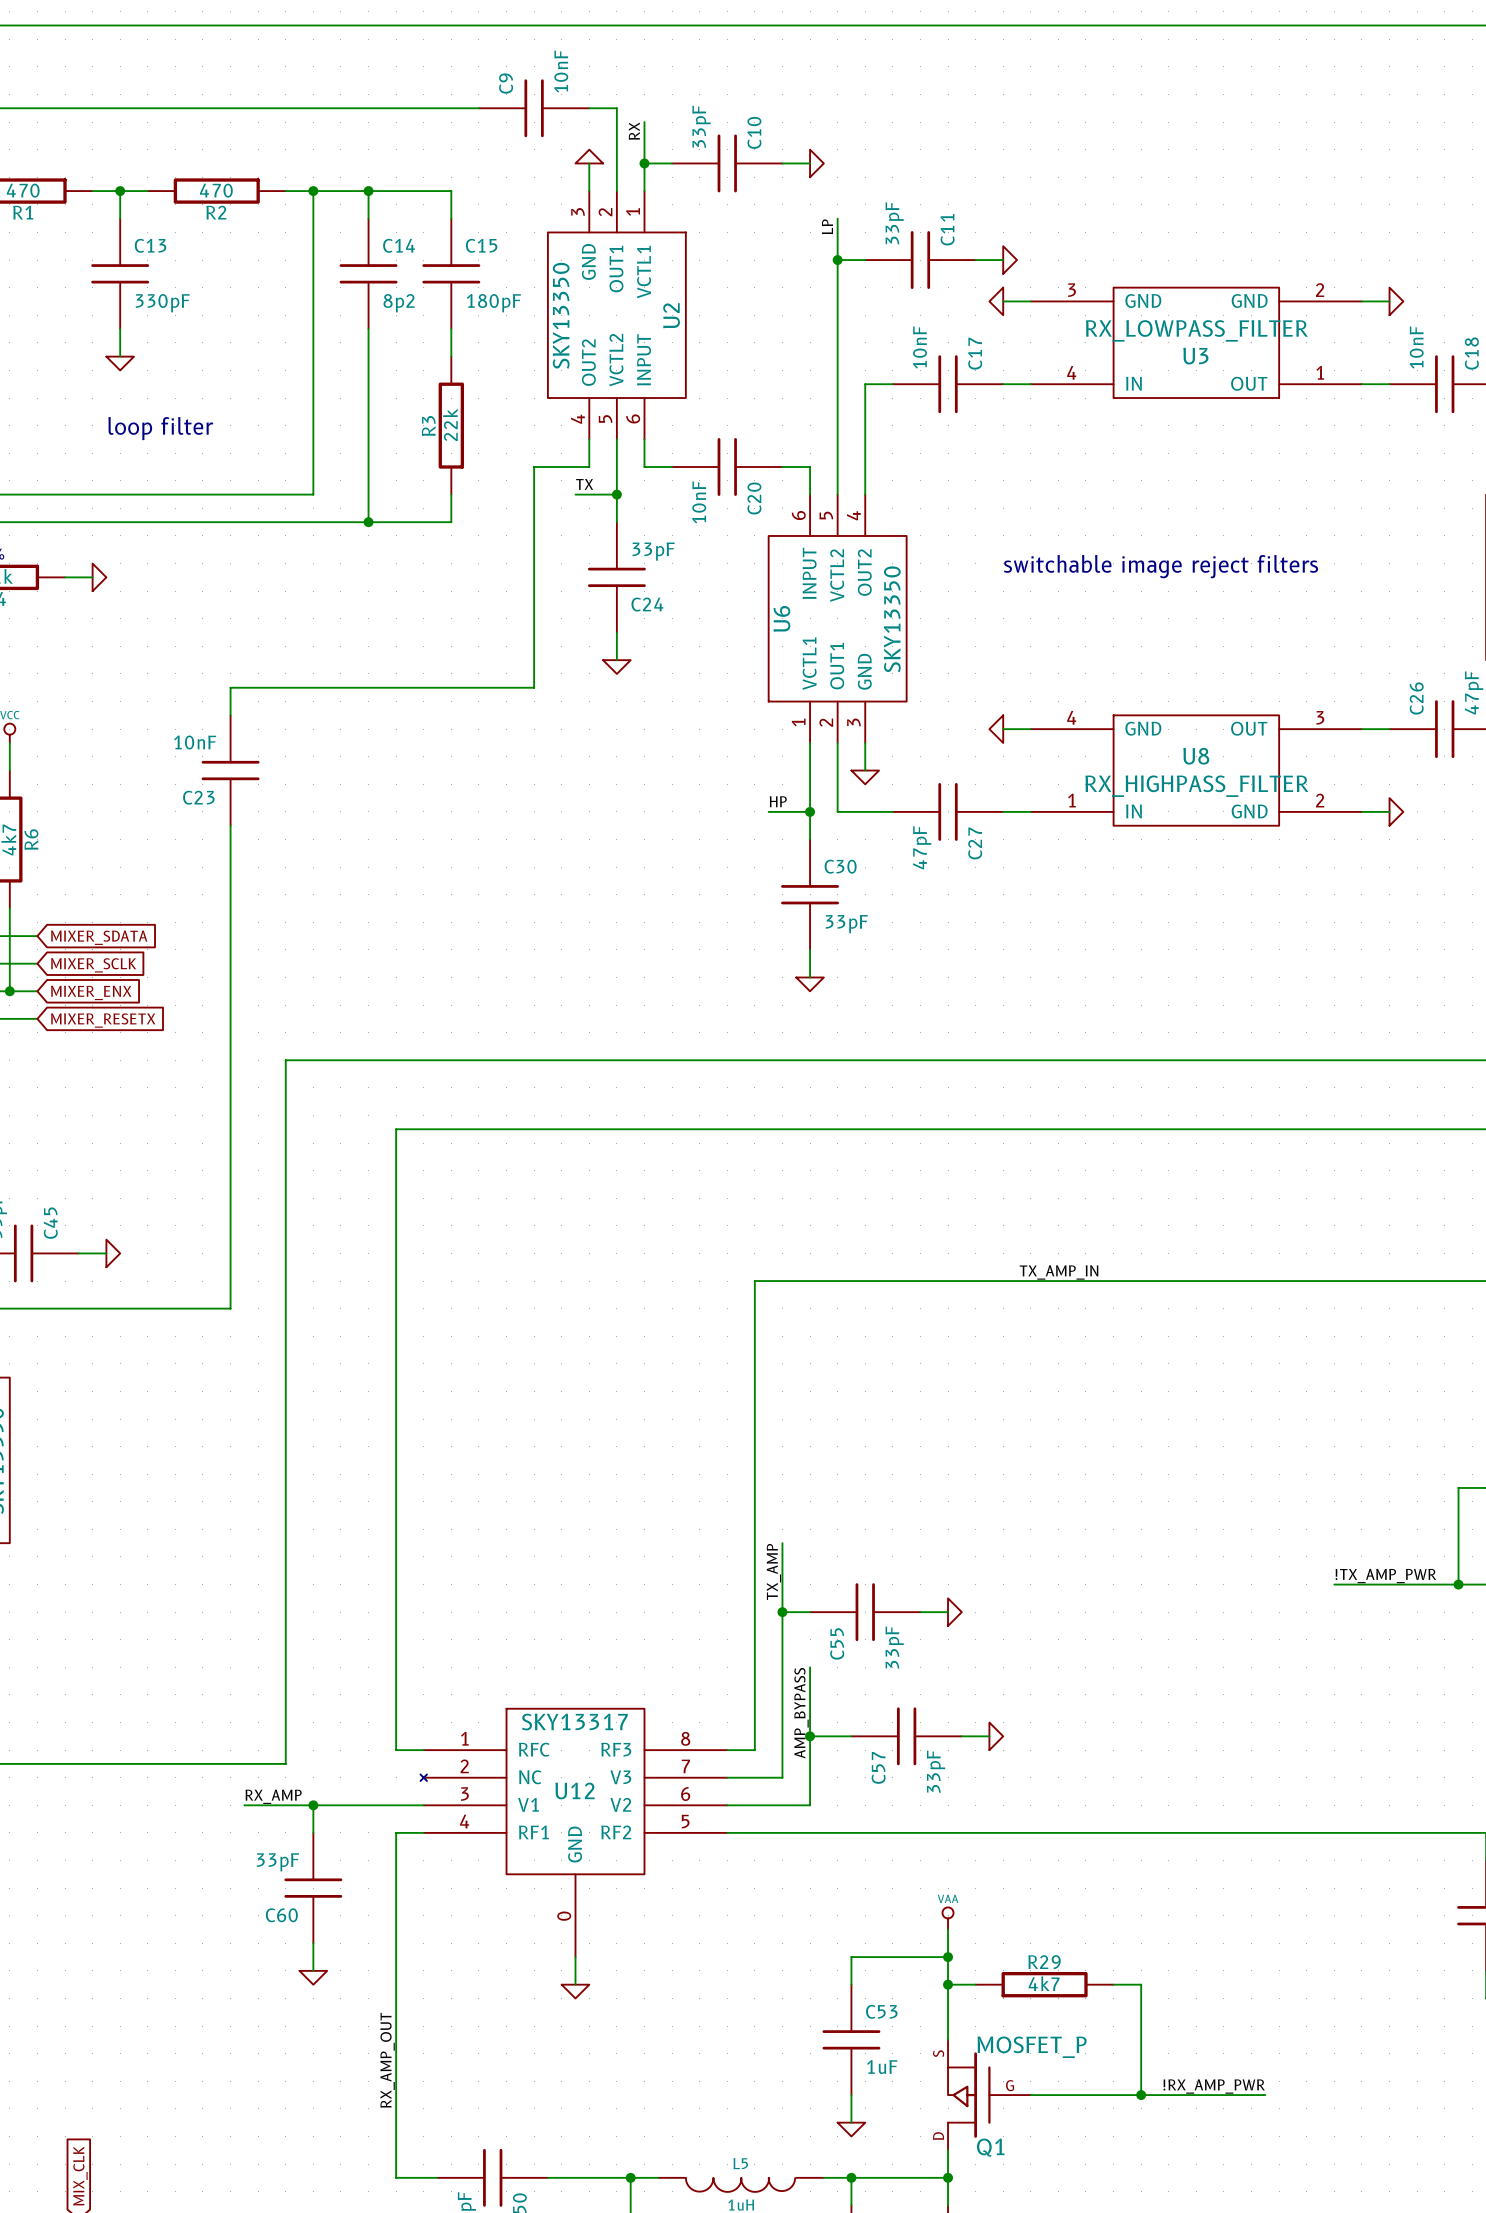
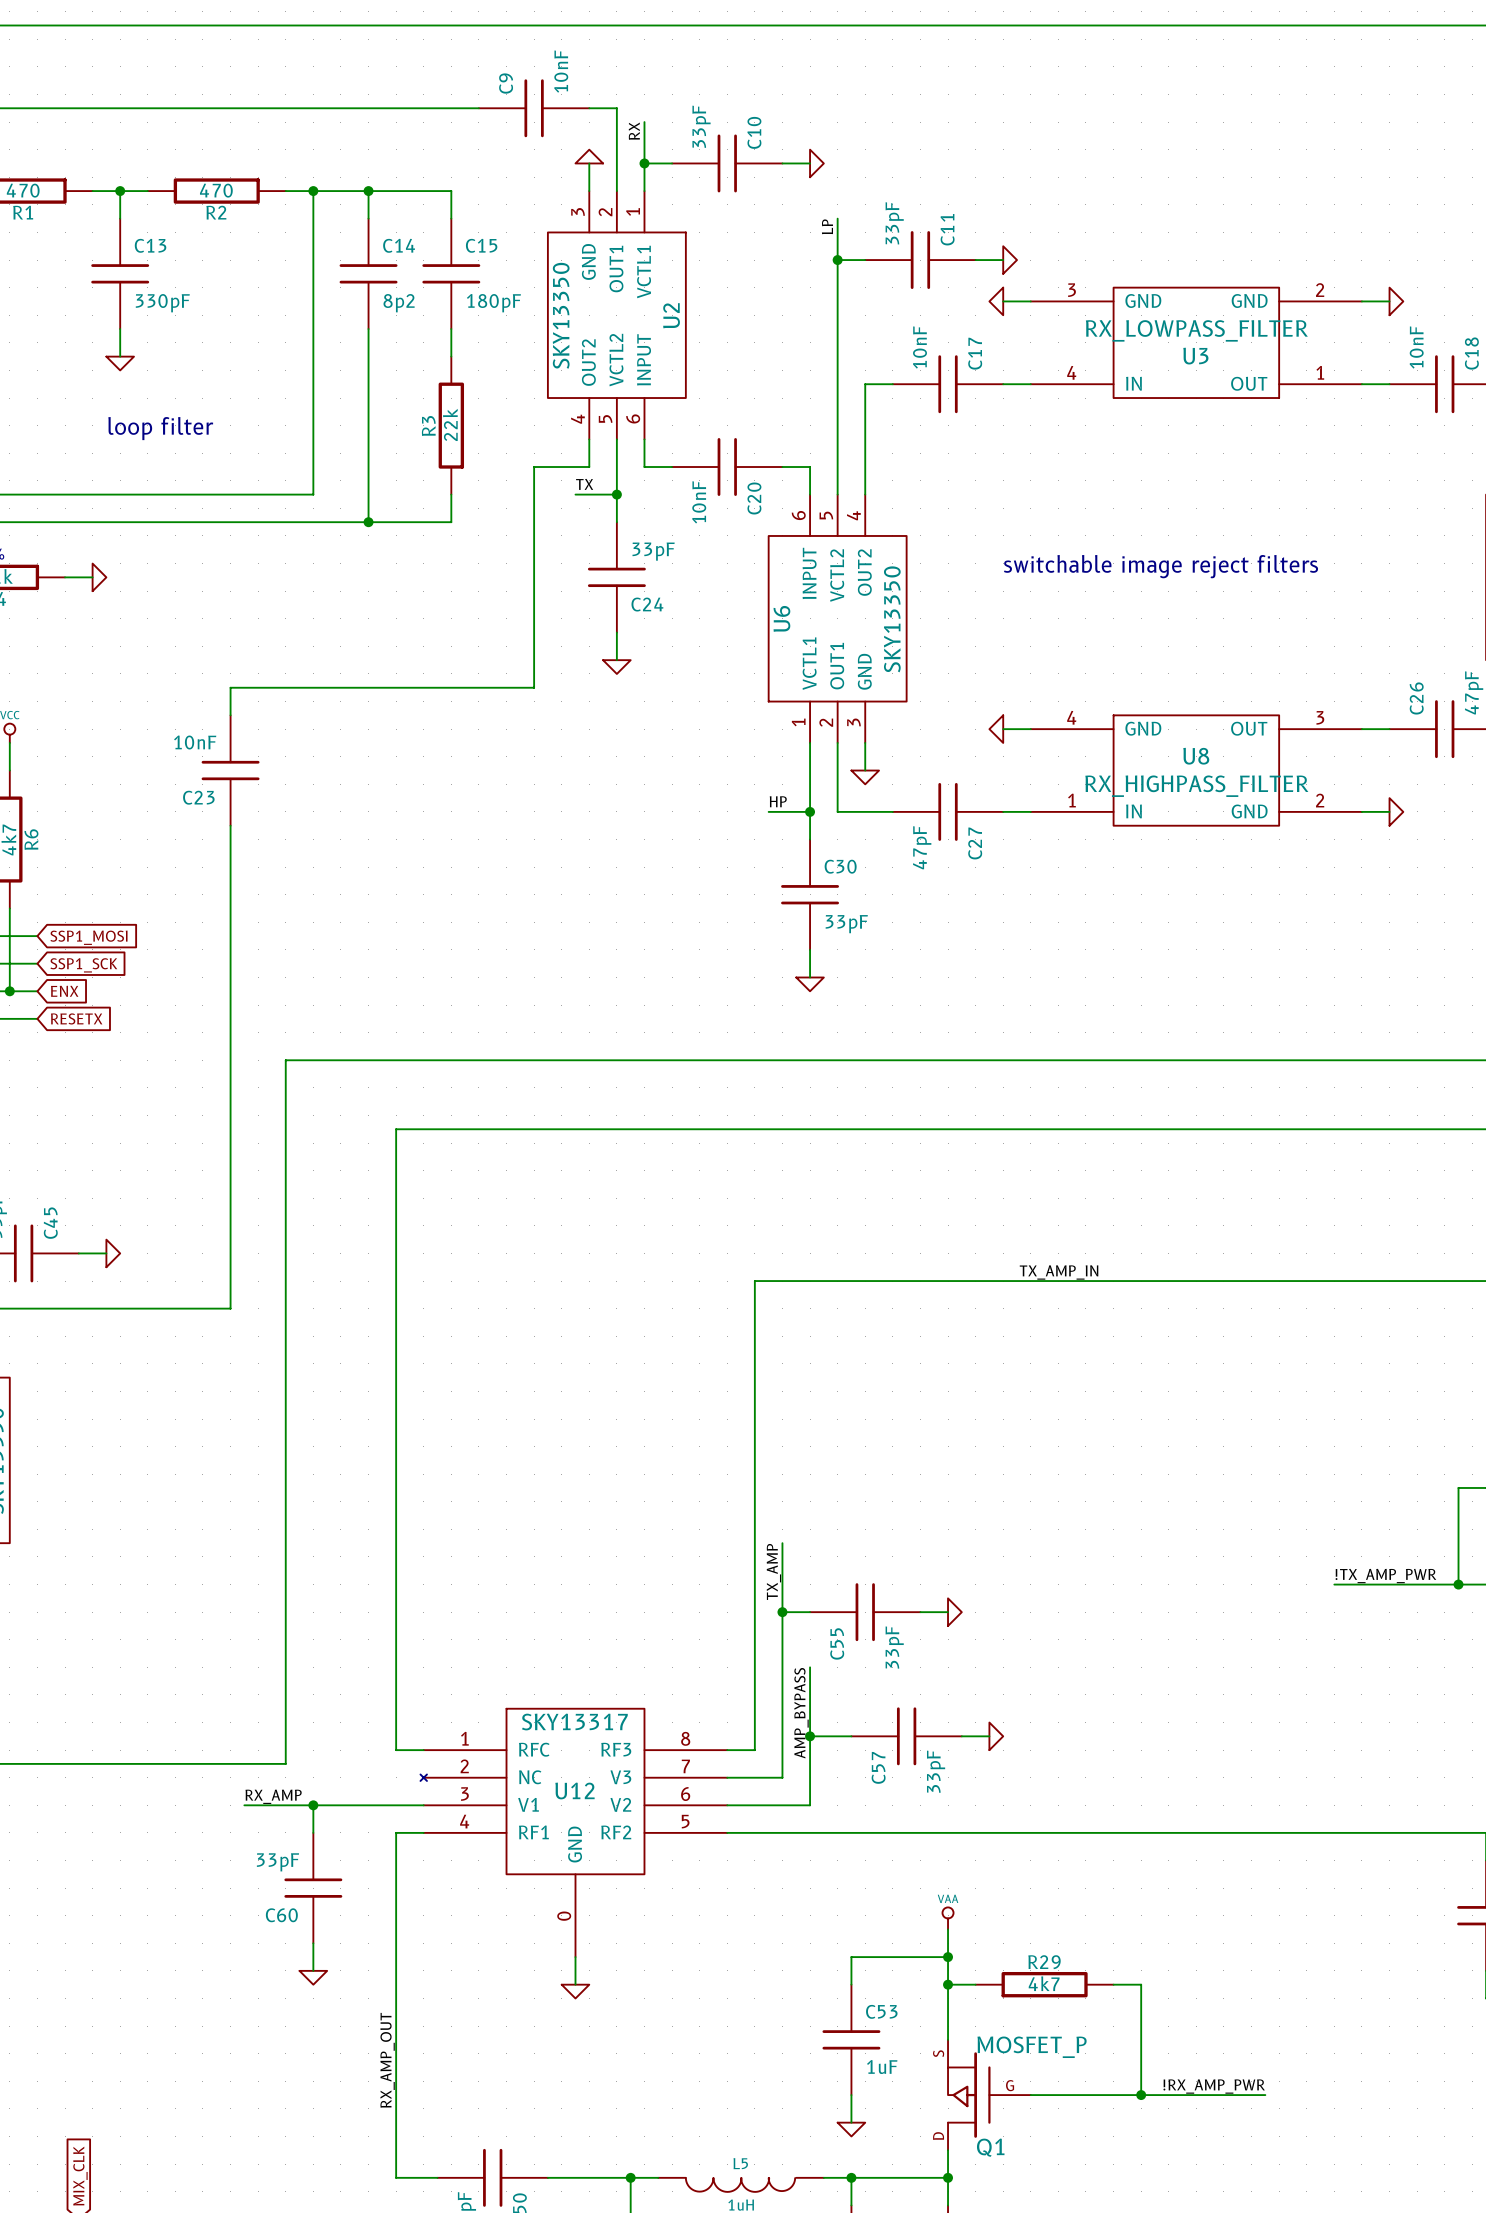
global label: MIXER_SDATA (99, 937) -> SSP1_MOSI (88, 937)
global label: MIXER_SCLK (93, 965) -> SSP1_SCK (83, 965)
global label: MIXER_ENX (91, 992) -> ENX (64, 991)
global label: MIXER_RESETX (103, 1020) -> RESETX (76, 1018)

